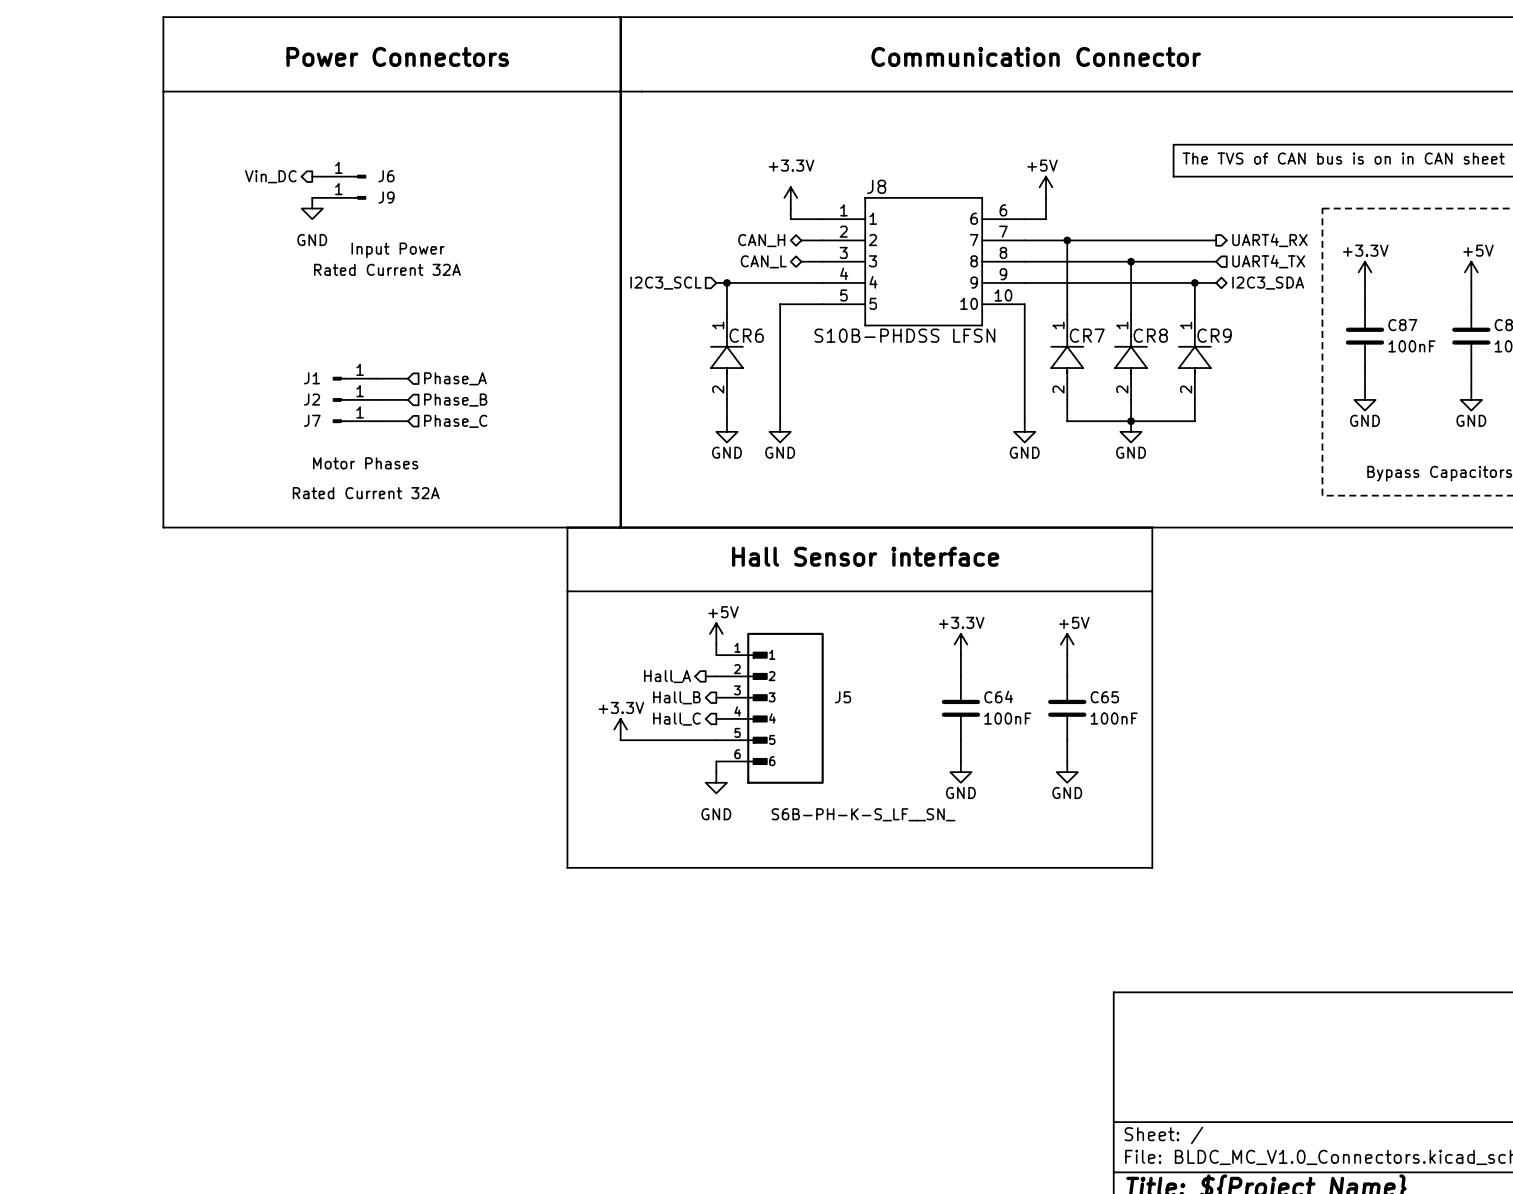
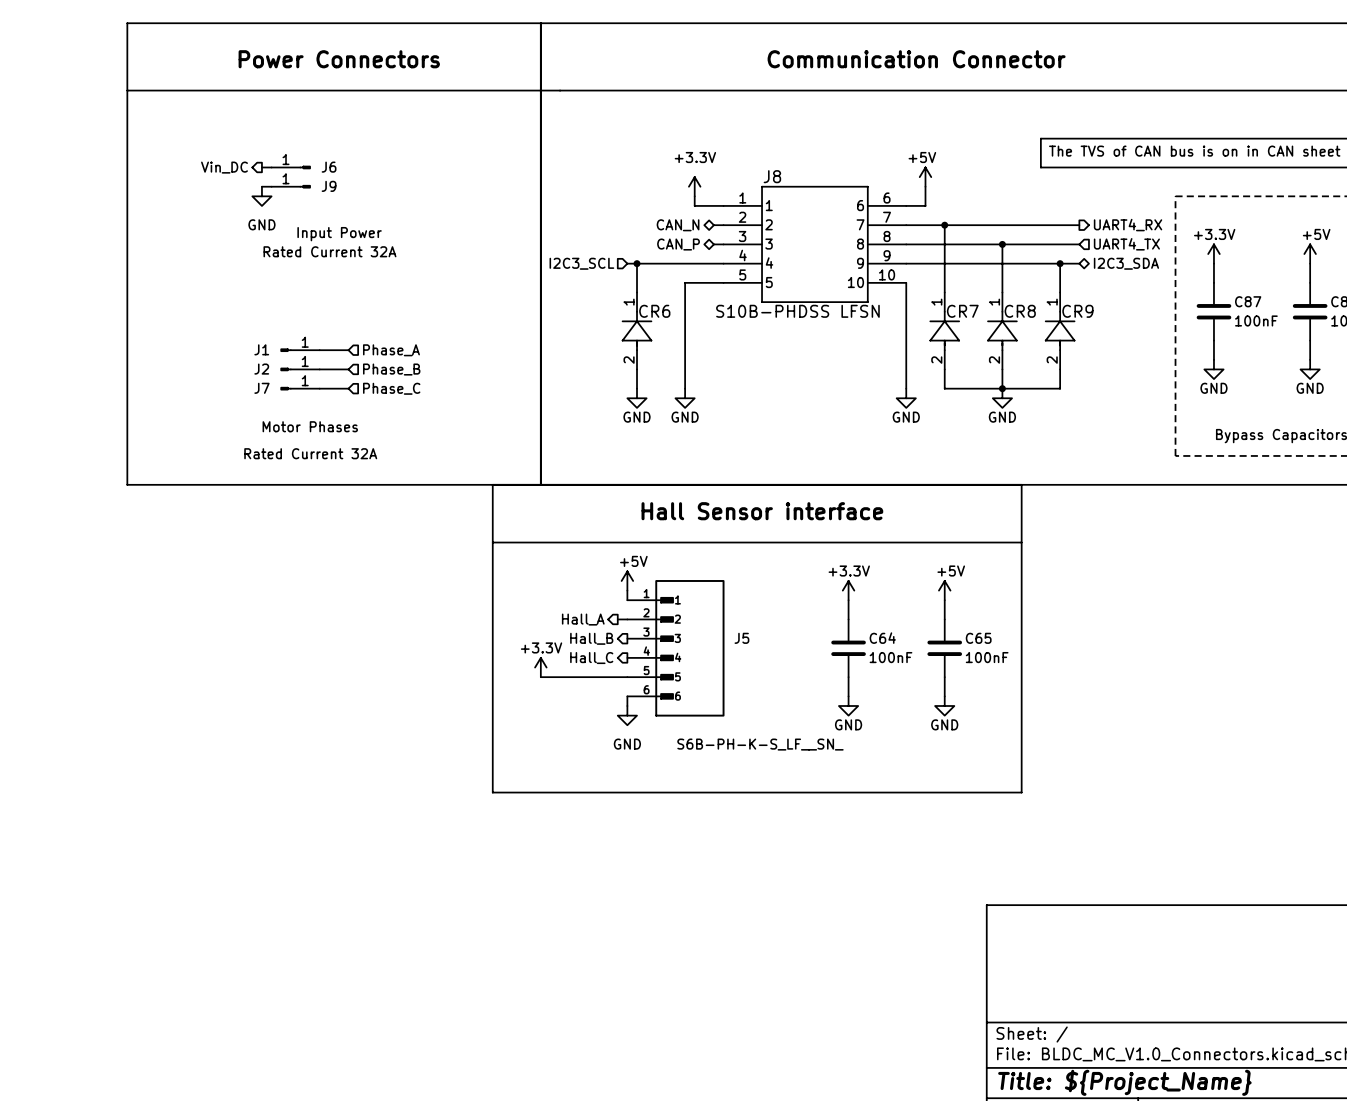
hierarchical label: CAN_H (761, 240) -> CAN_N (678, 225)
wire: (801, 240) (812, 240) -> none
hierarchical label: CAN_L (763, 261) -> CAN_P (678, 244)
wire: (801, 261) (812, 261) -> none

